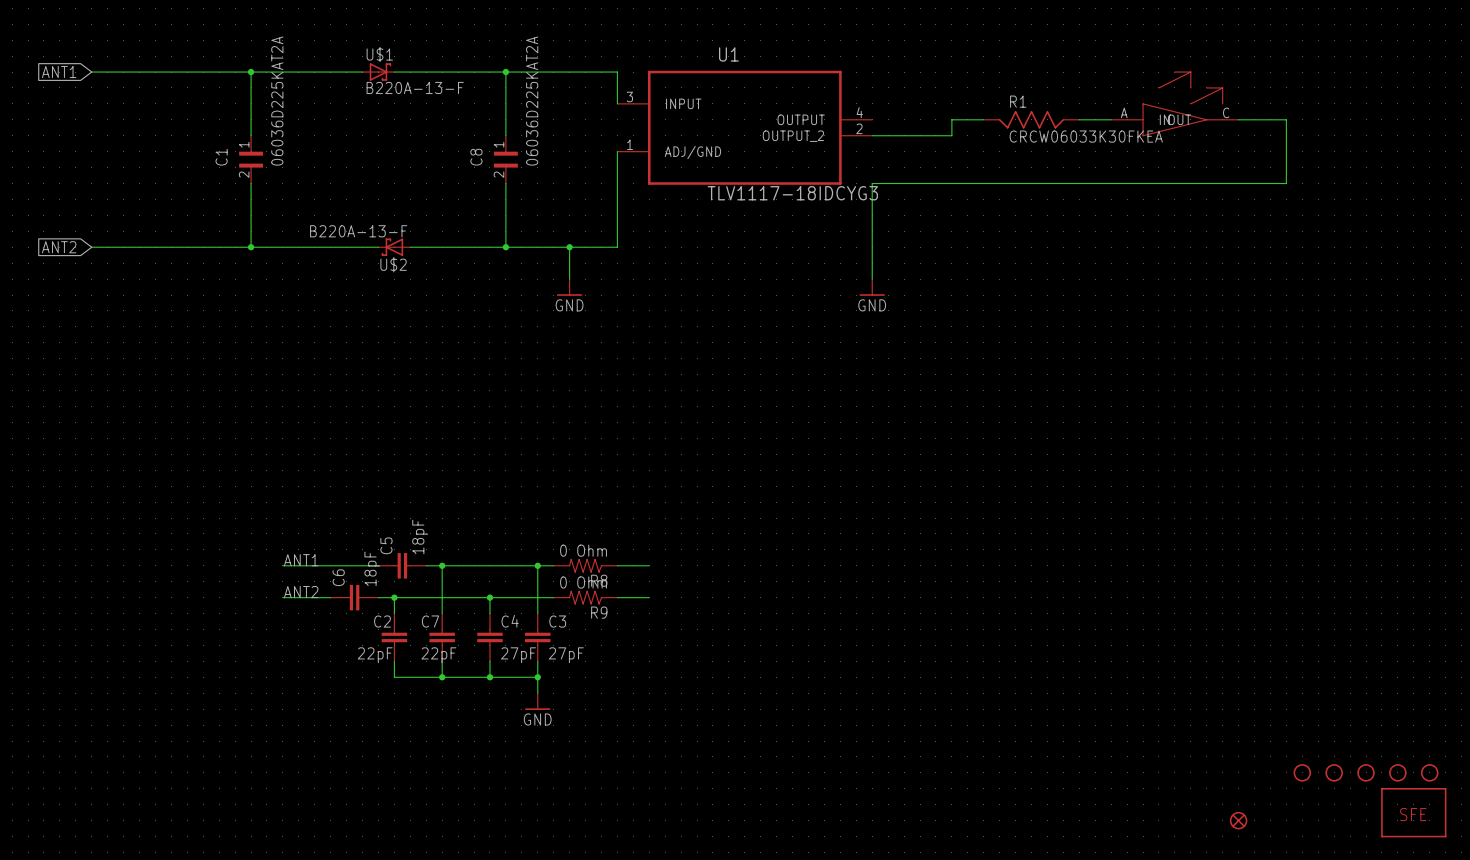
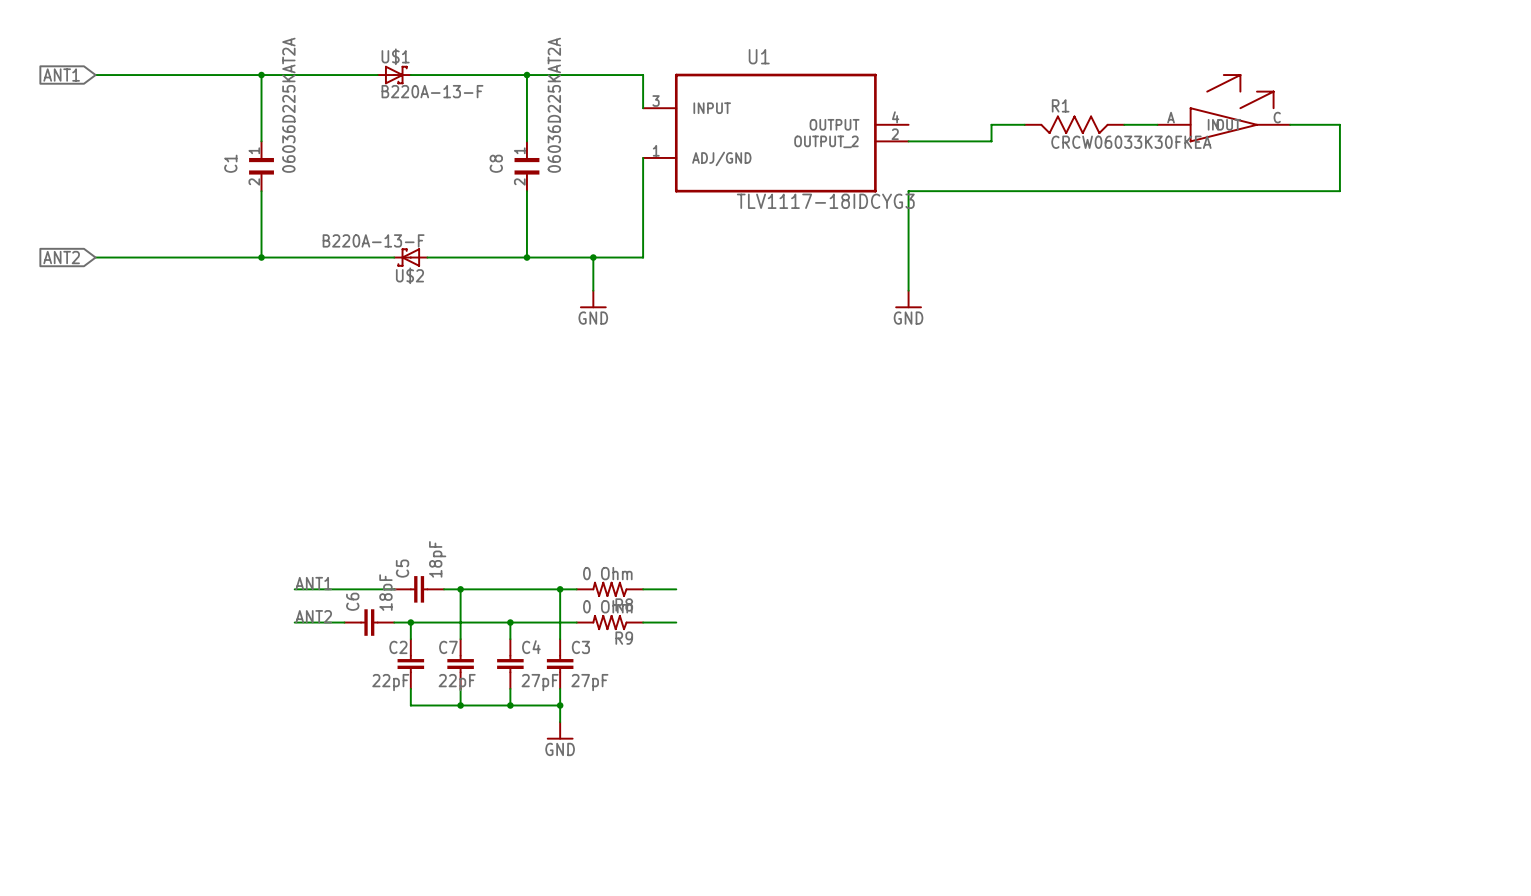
part: (1302, 772) -> none
part: (1334, 772) -> none
part: (1366, 772) -> none
part: (1397, 772) -> none
part: (1429, 772) -> none
part: (1413, 812) -> none
part: (1238, 820) -> none

